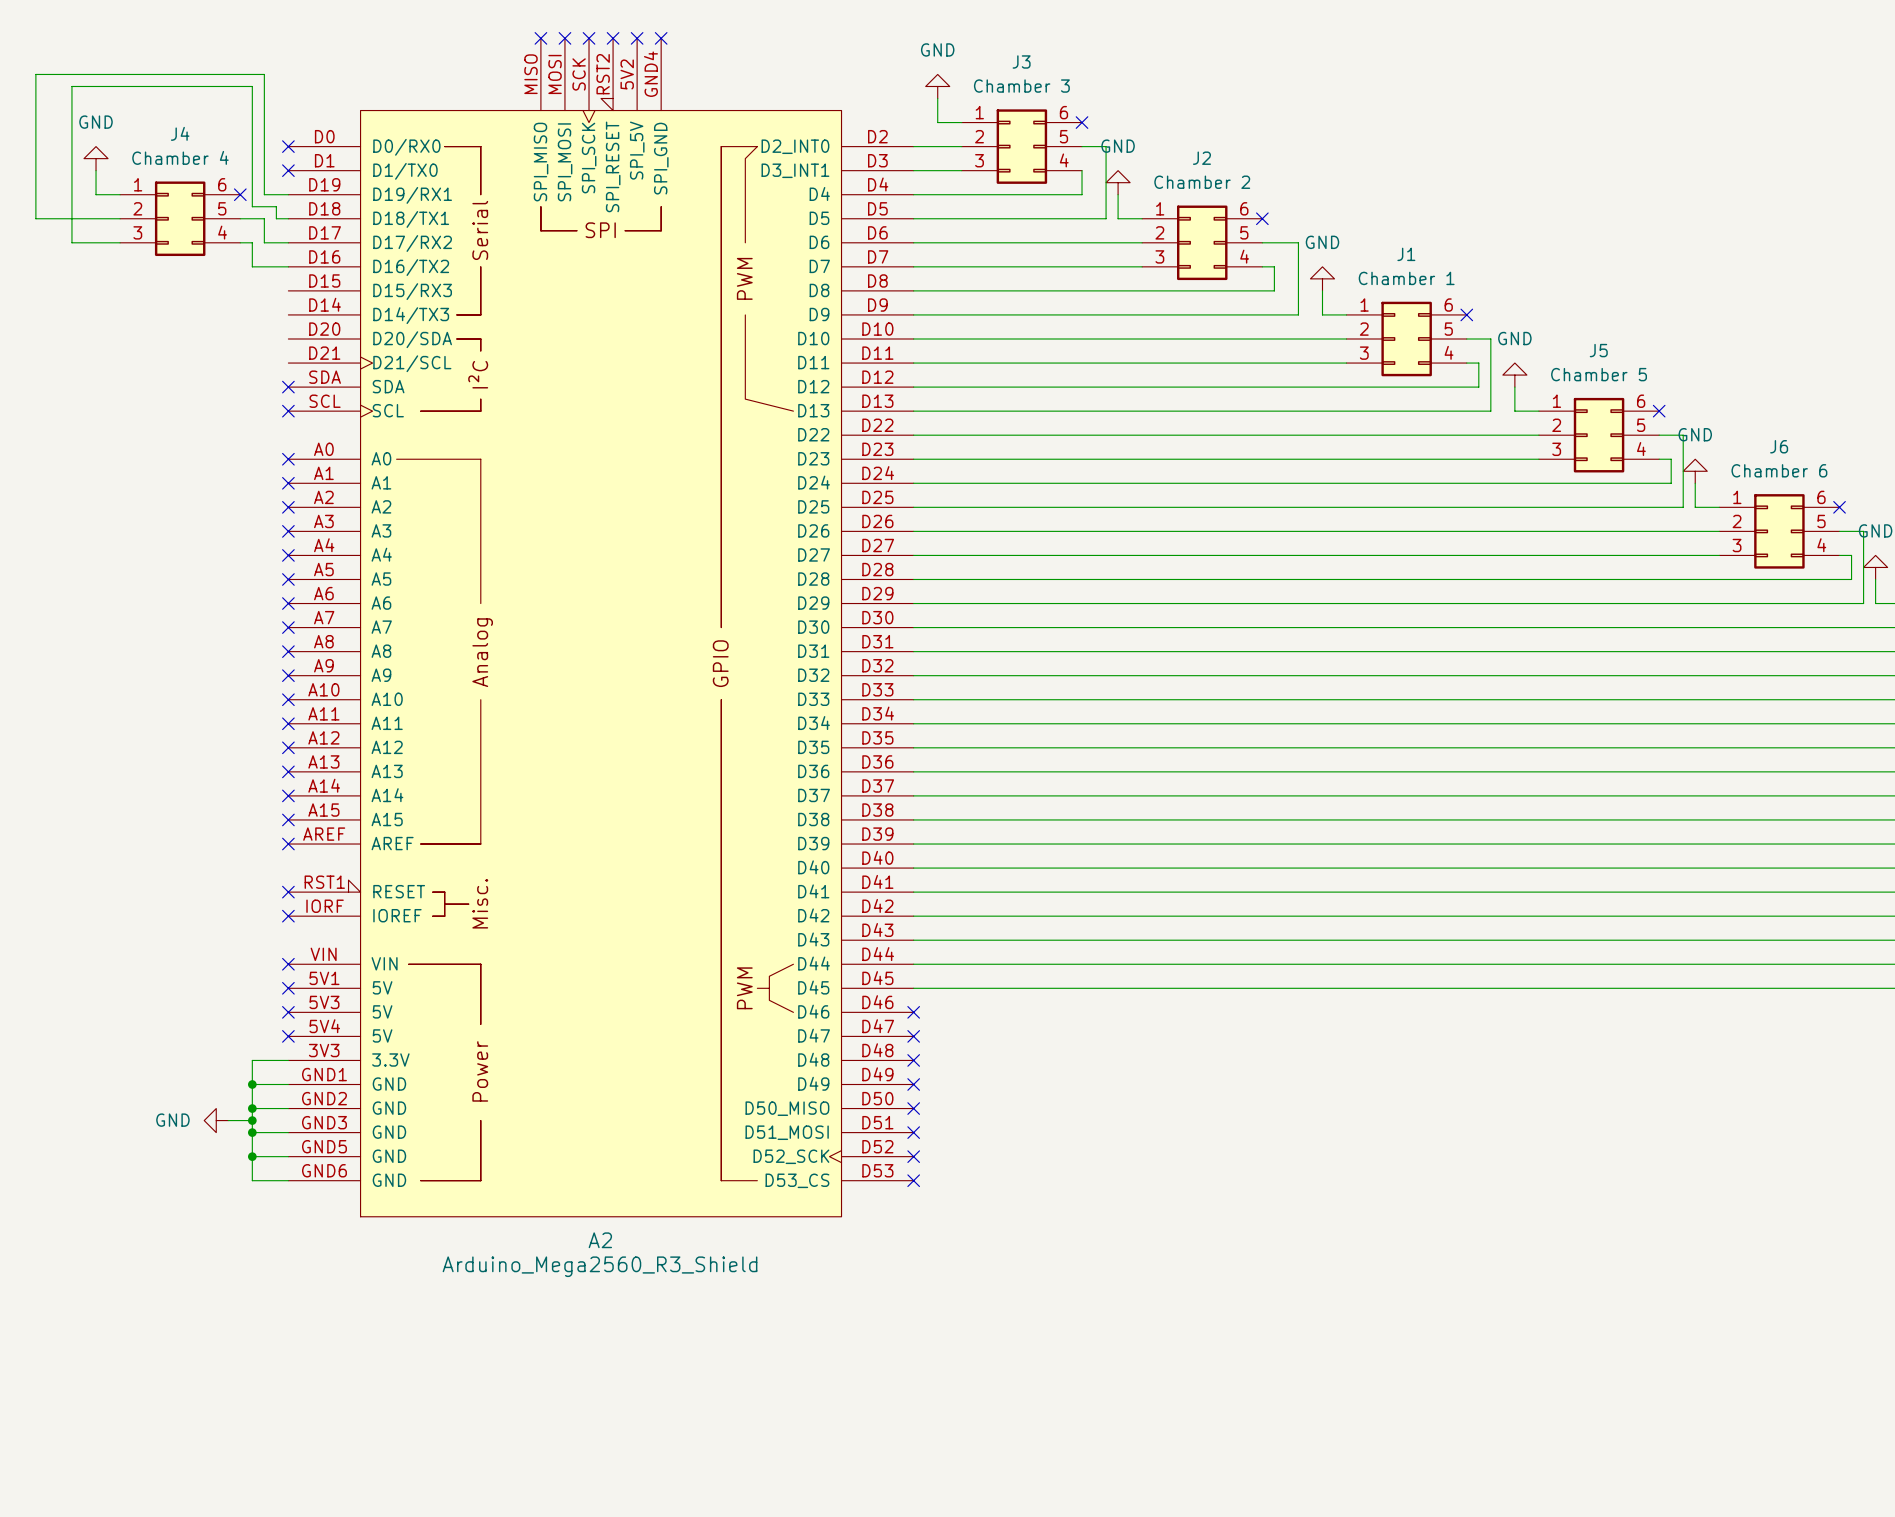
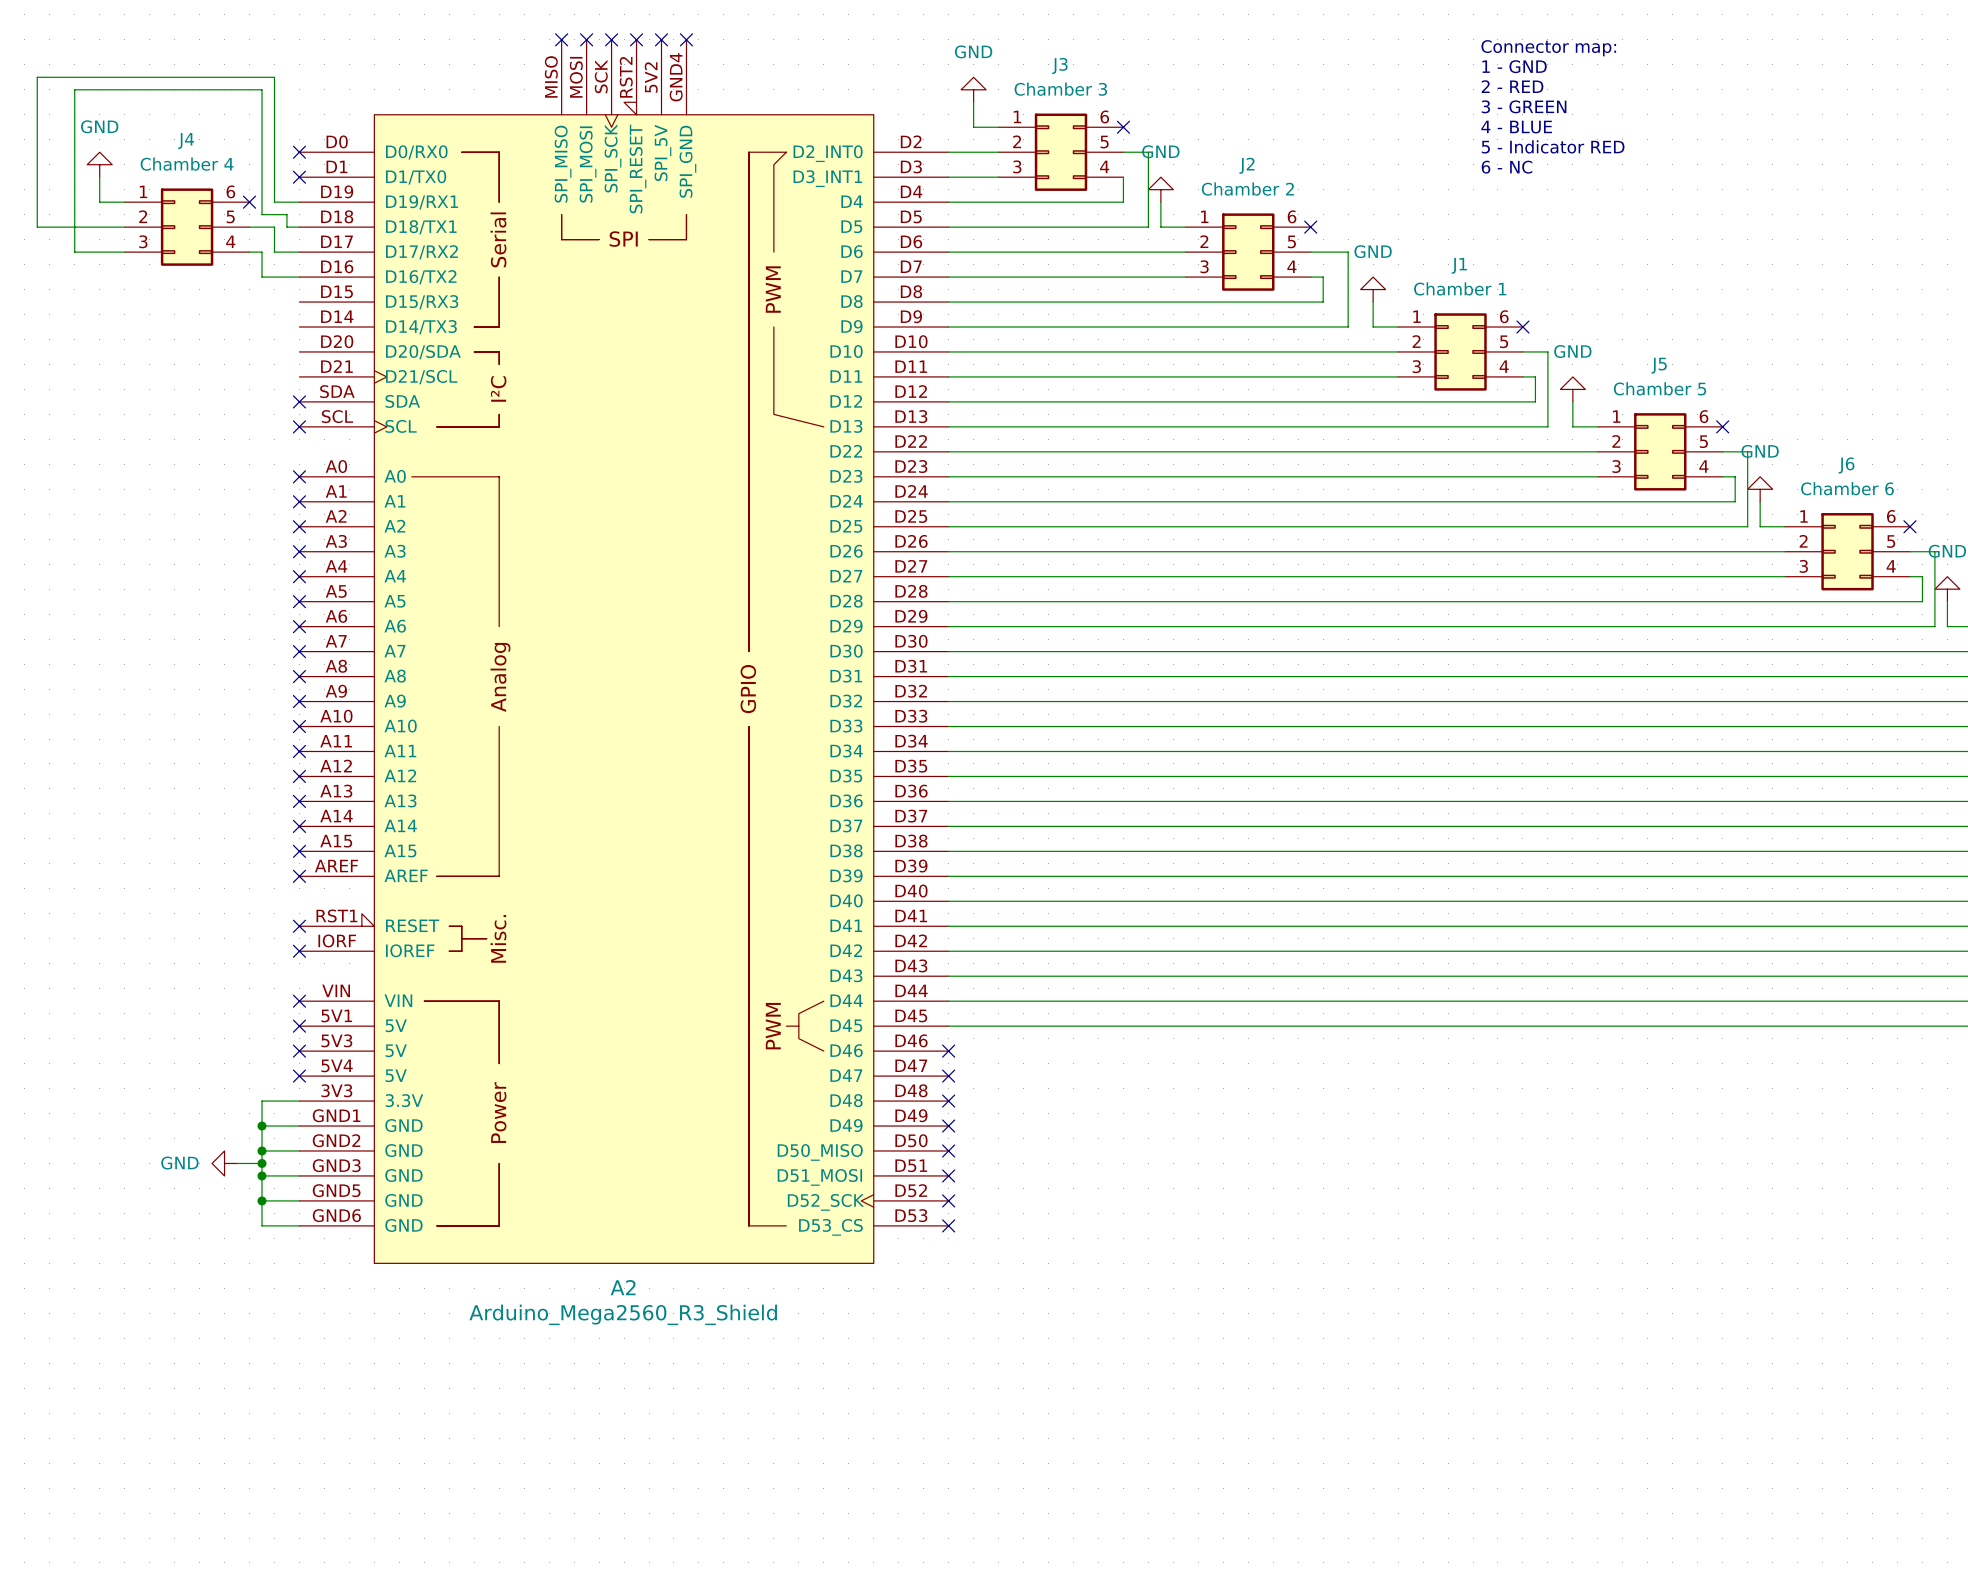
text: none -> Connector map: (1548, 48)
text: none -> 1 - GND (1514, 66)
text: none -> 2 - RED (1512, 86)
text: none -> 3 - GREEN (1524, 106)
text: none -> 4 - BLUE (1516, 127)
text: none -> 5 - Indicator RED (1553, 146)
text: none -> 6 - NC (1506, 167)

